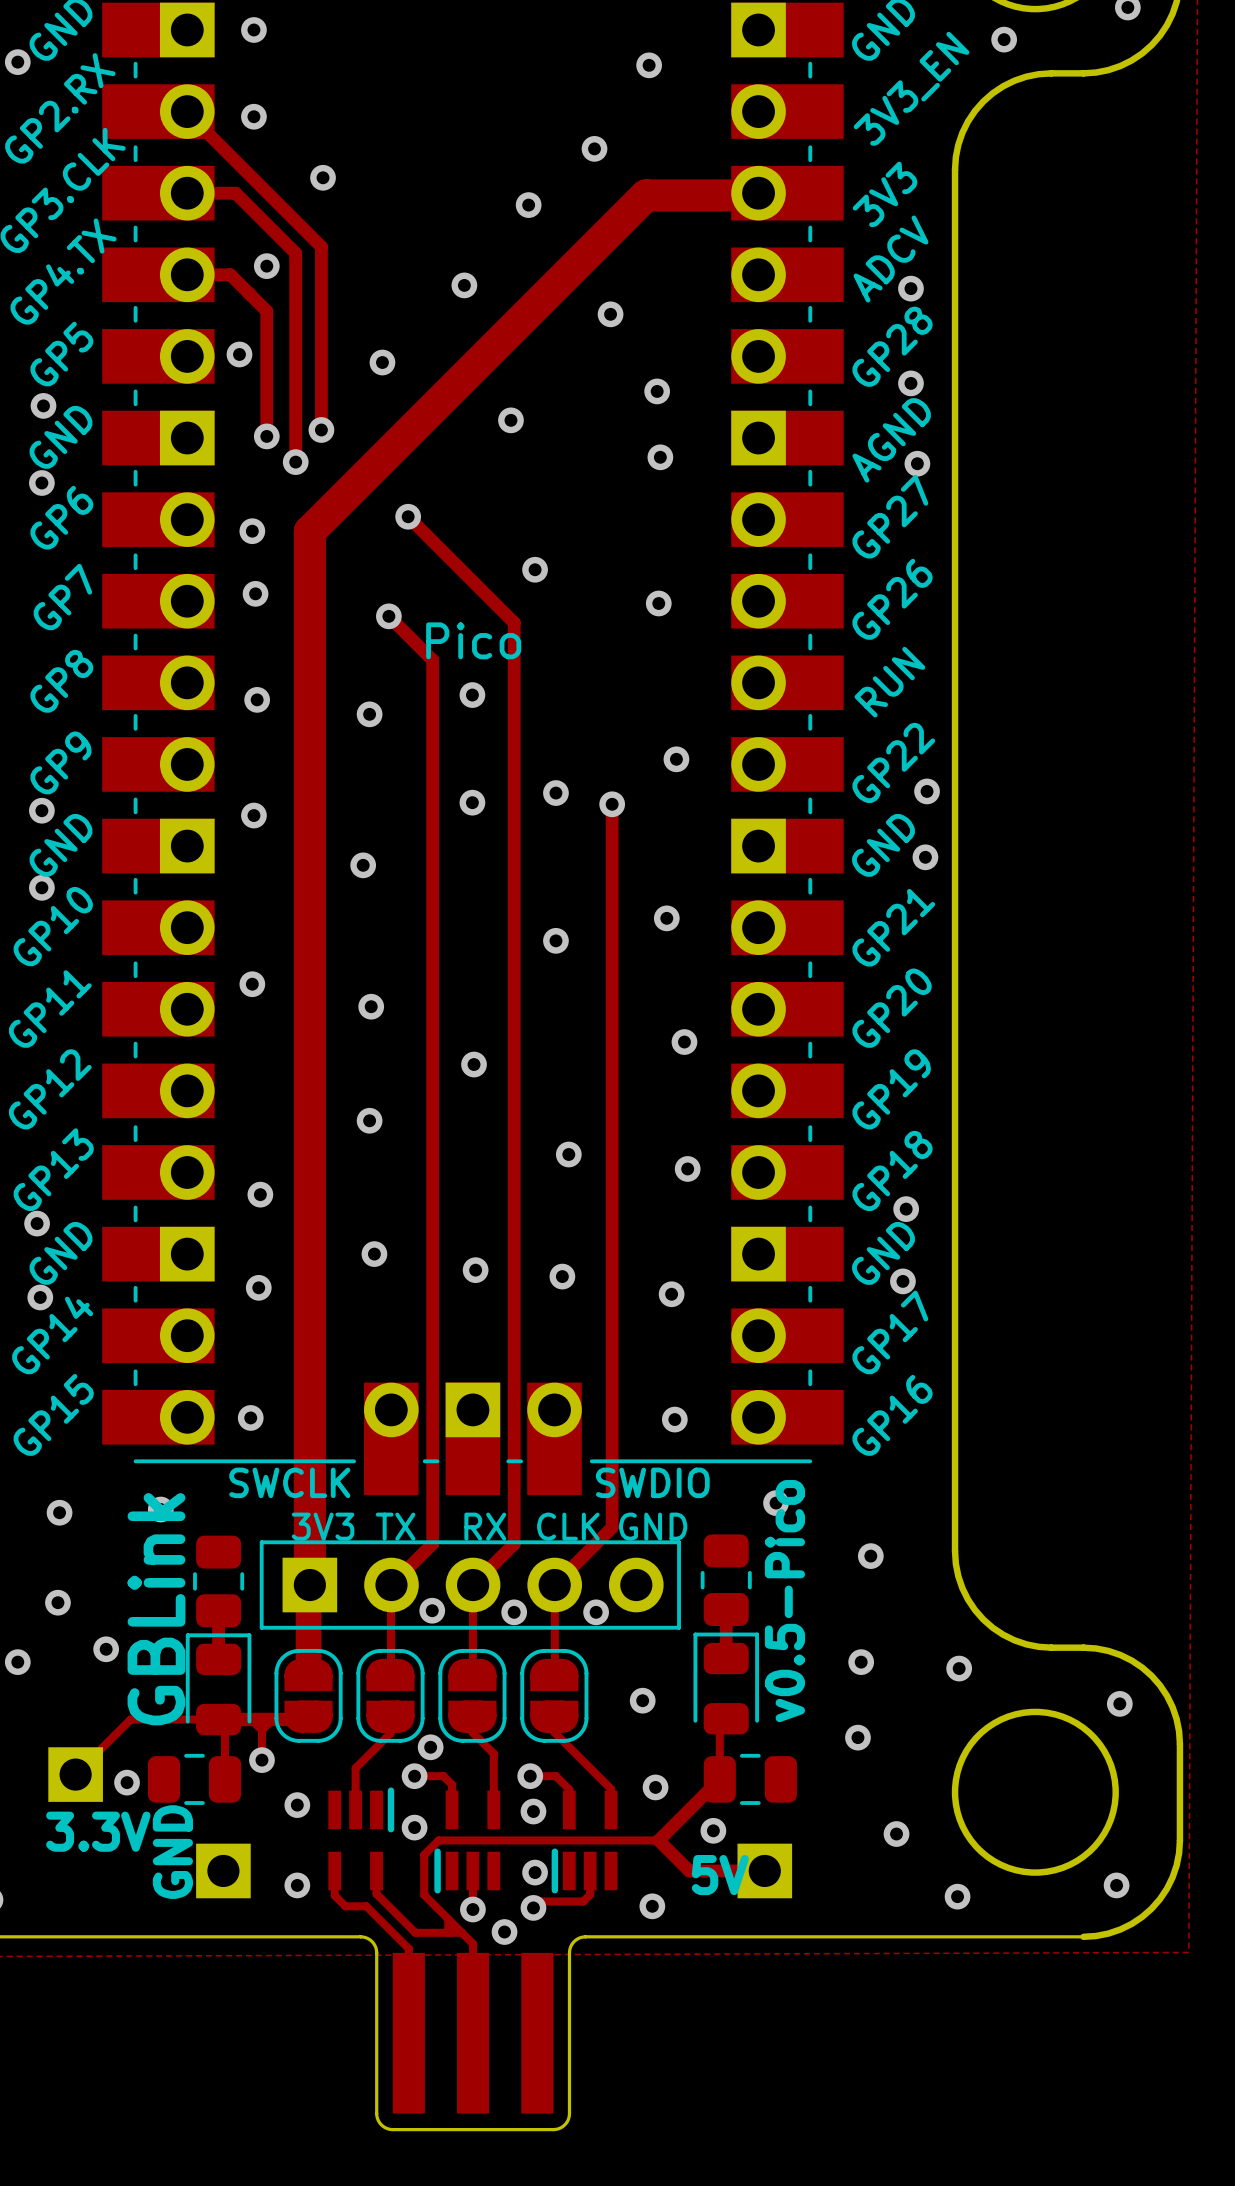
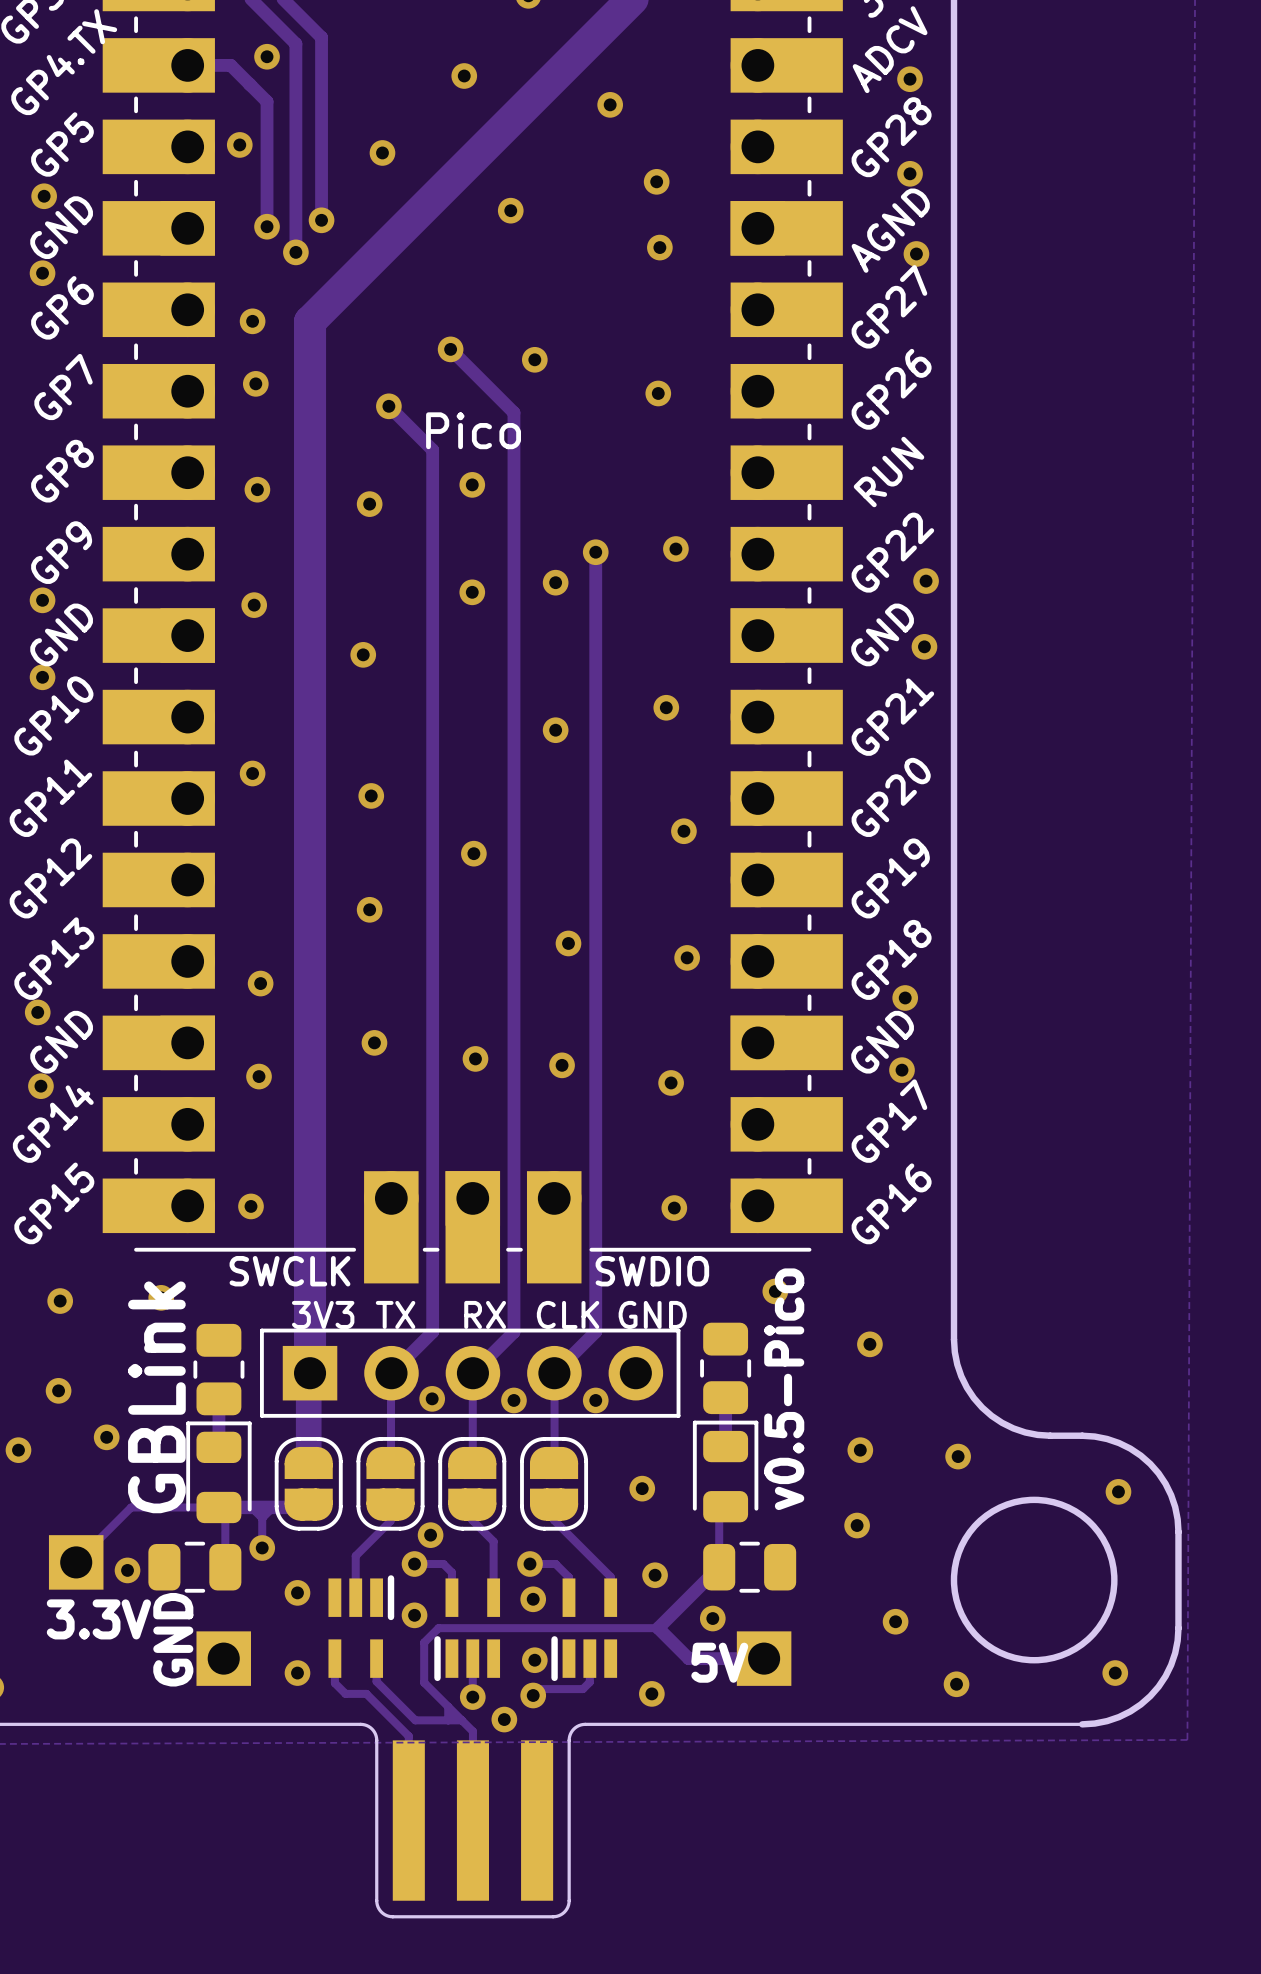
track: (408, 516) (450, 559) -> none
via position: (408, 516) -> (450, 349)
track: (612, 804) (612, 1527) (596, 1543) -> (595, 552) (595, 1331)
via position: (612, 804) -> (595, 552)

